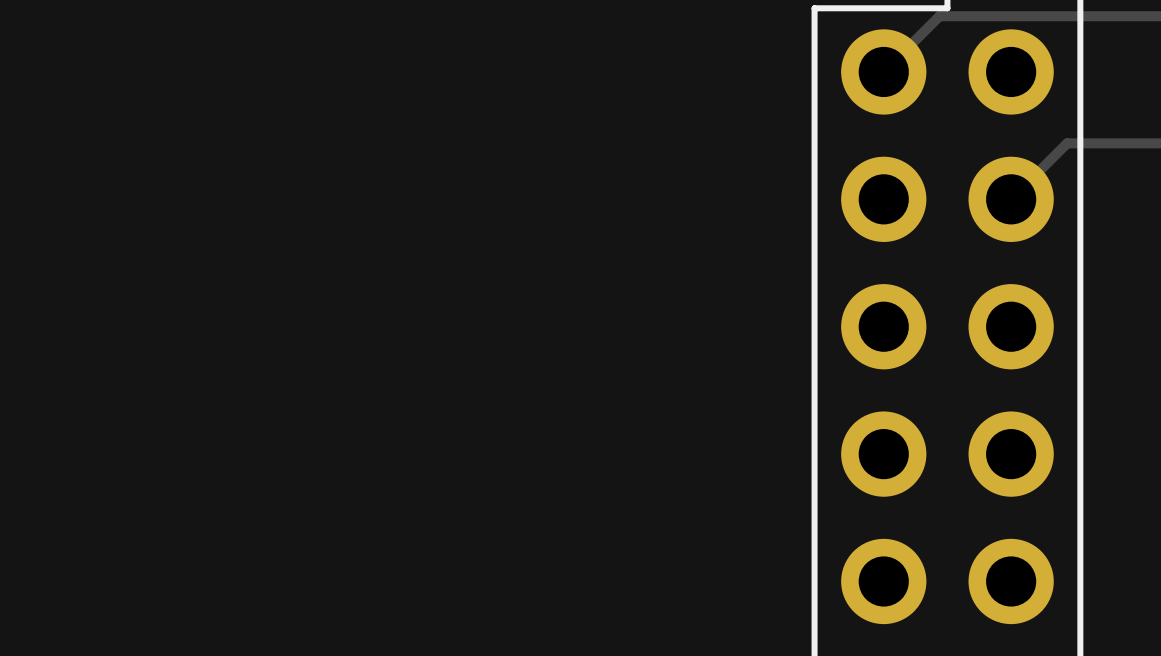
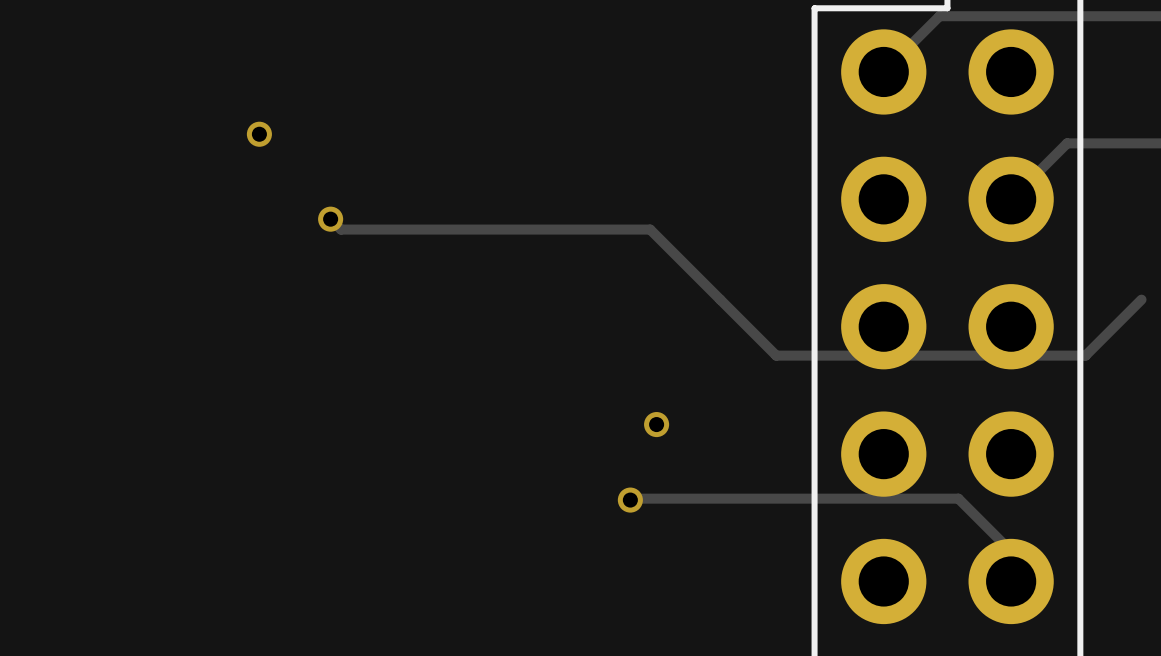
via: none -> (259, 134)
track: none -> (330, 219) (341, 229) (650, 229) (776, 355) (1085, 355) (1141, 299)
via: none -> (330, 219)
via: none -> (656, 424)
track: none -> (630, 500) (958, 498) (1014, 554)
via: none -> (630, 500)

